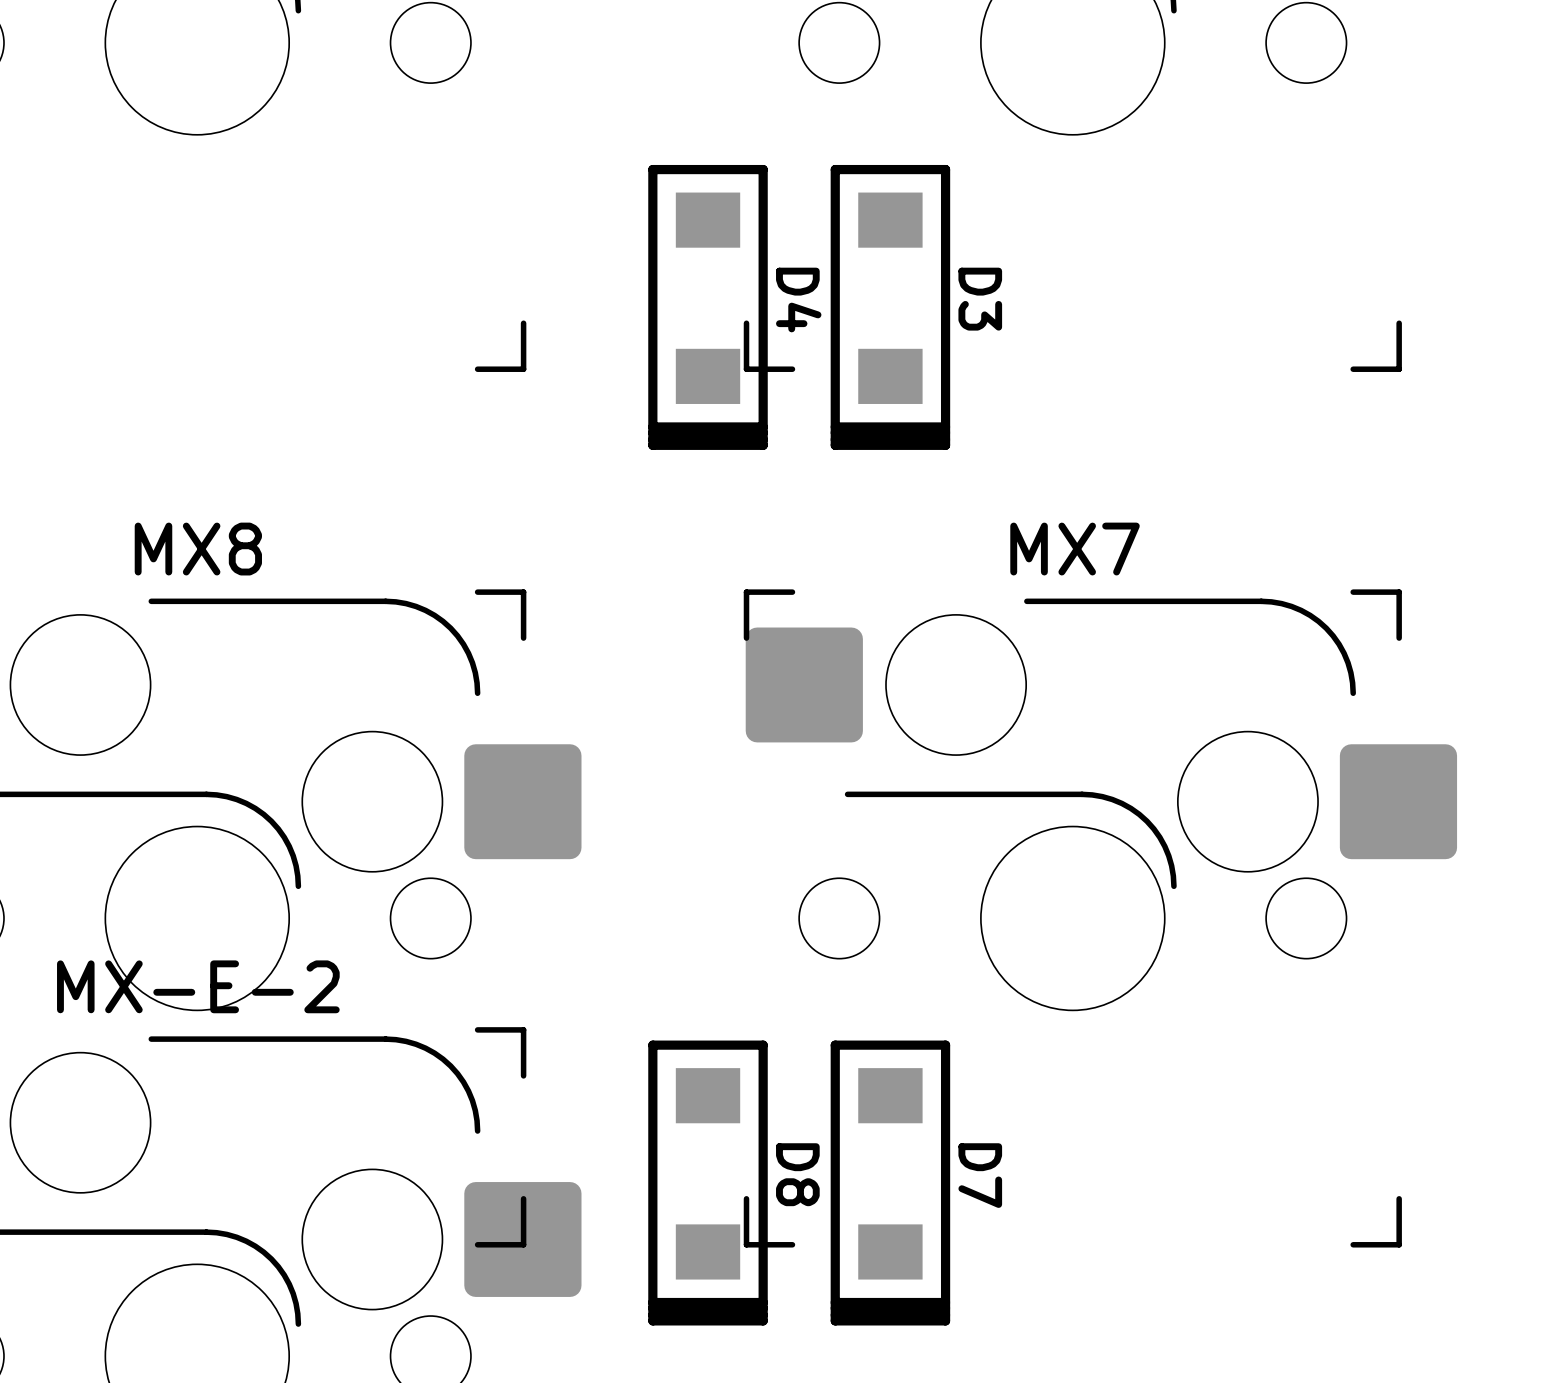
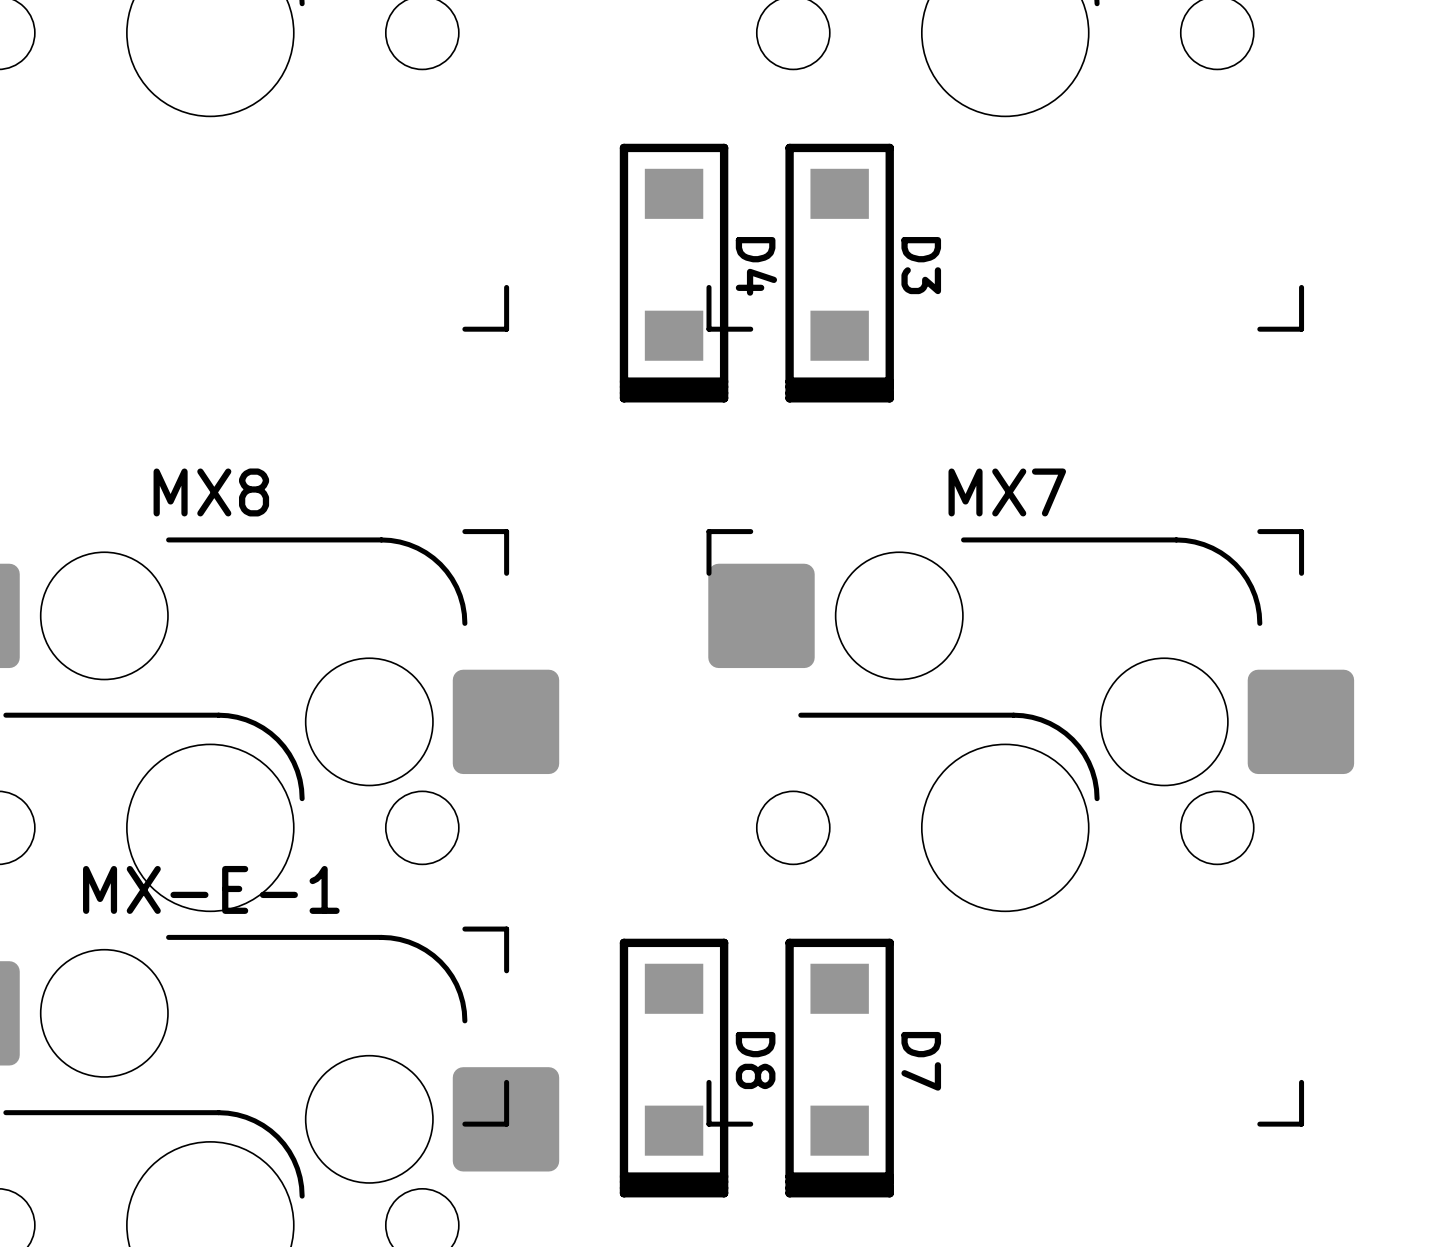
MX-E-2 name: MX-E-2 (198, 986) -> MX-E-1 (211, 889)

